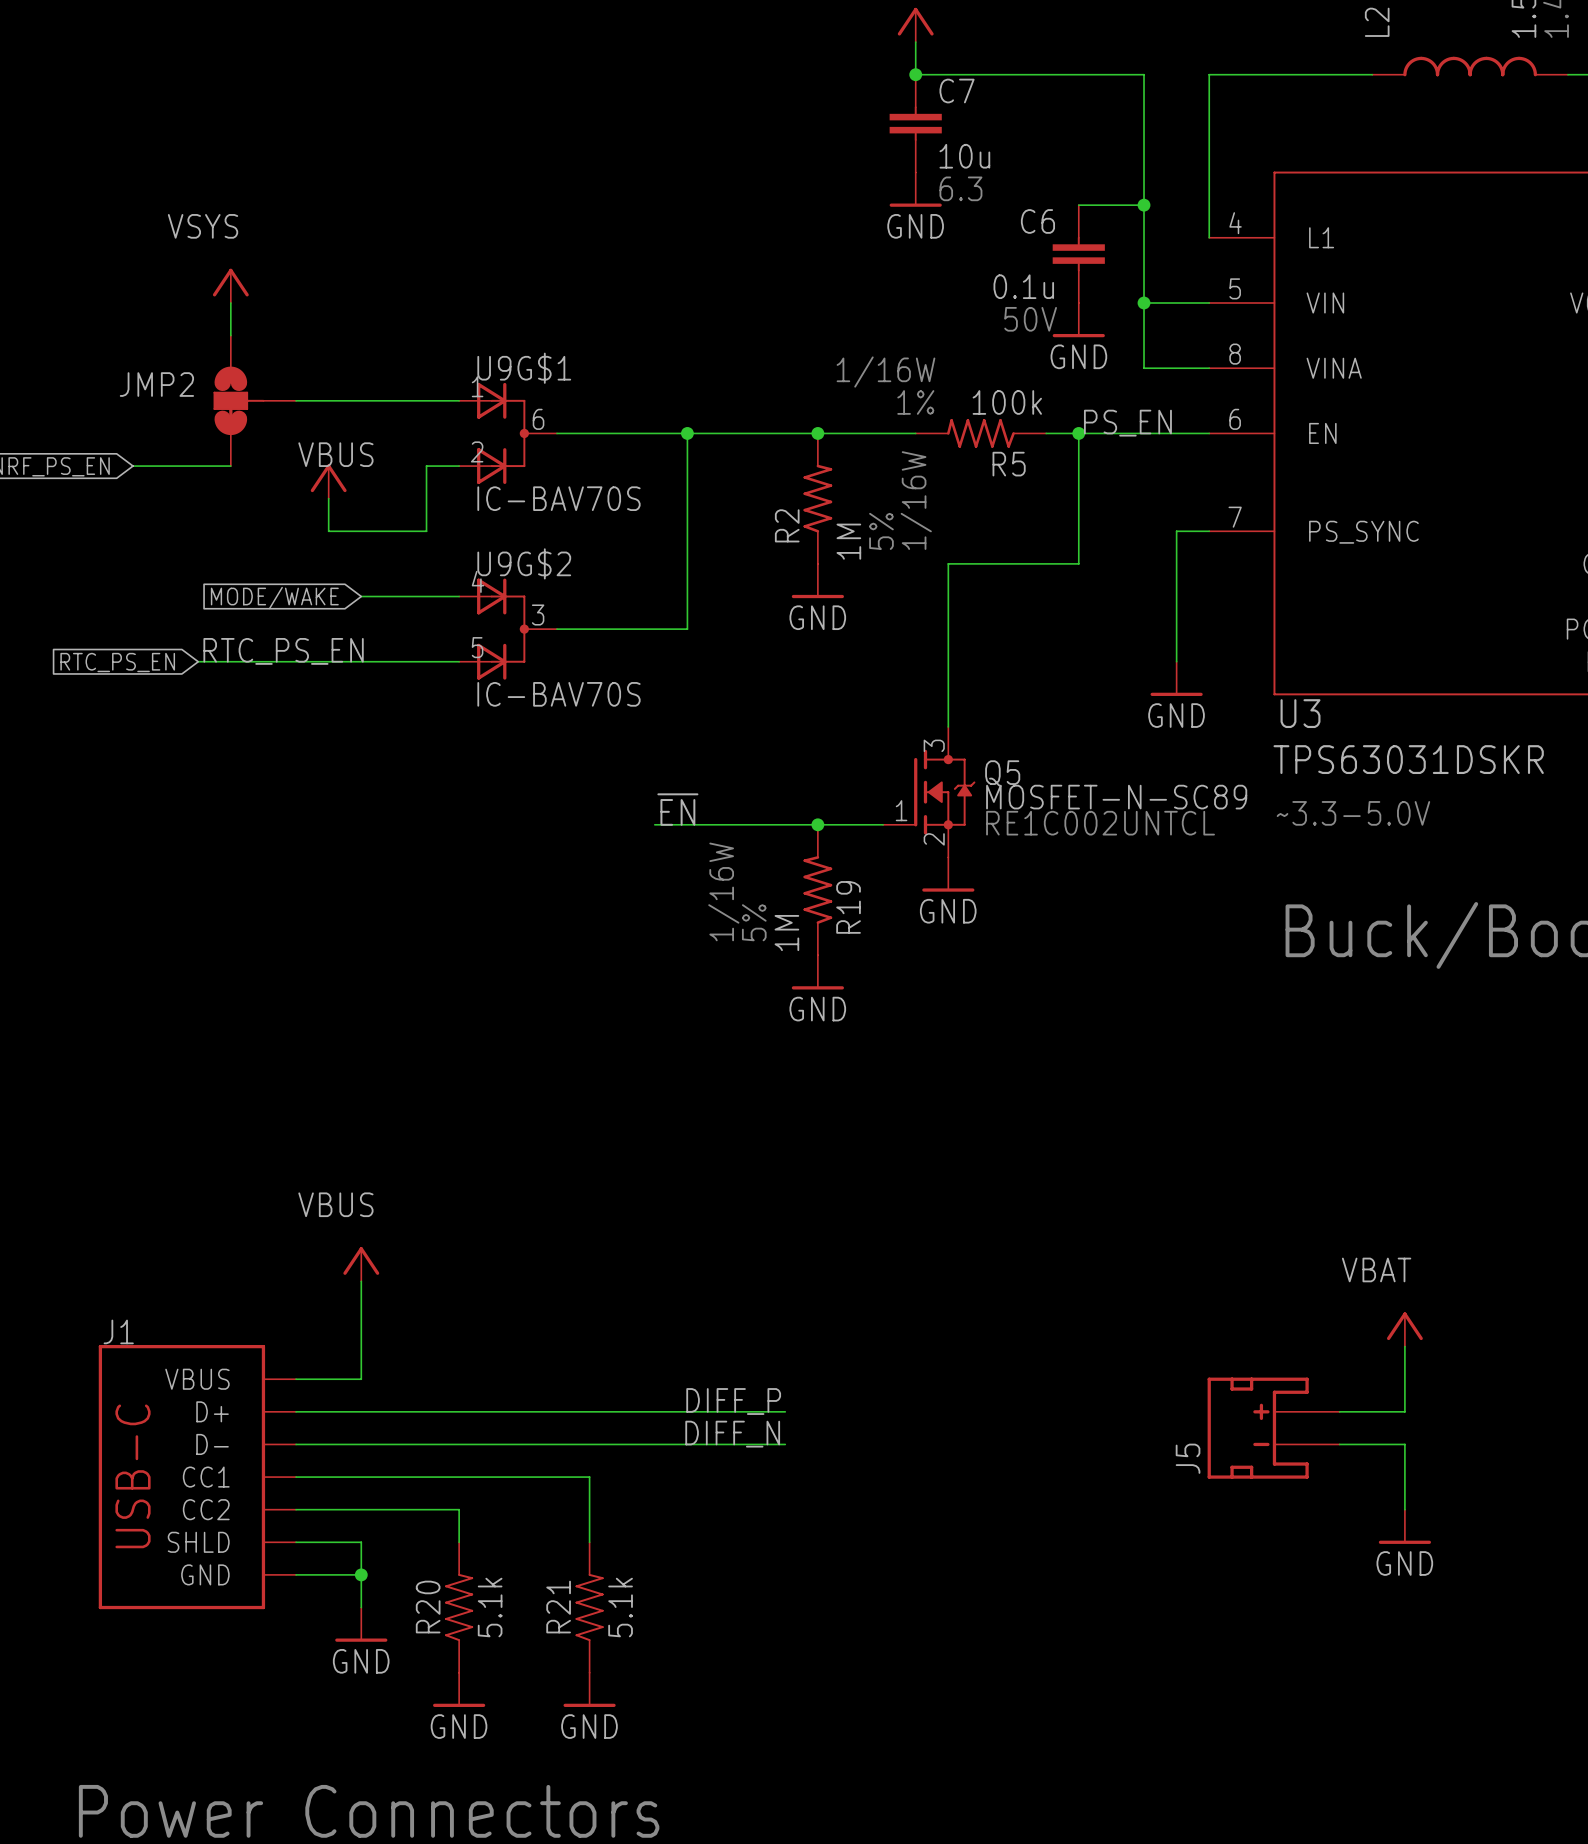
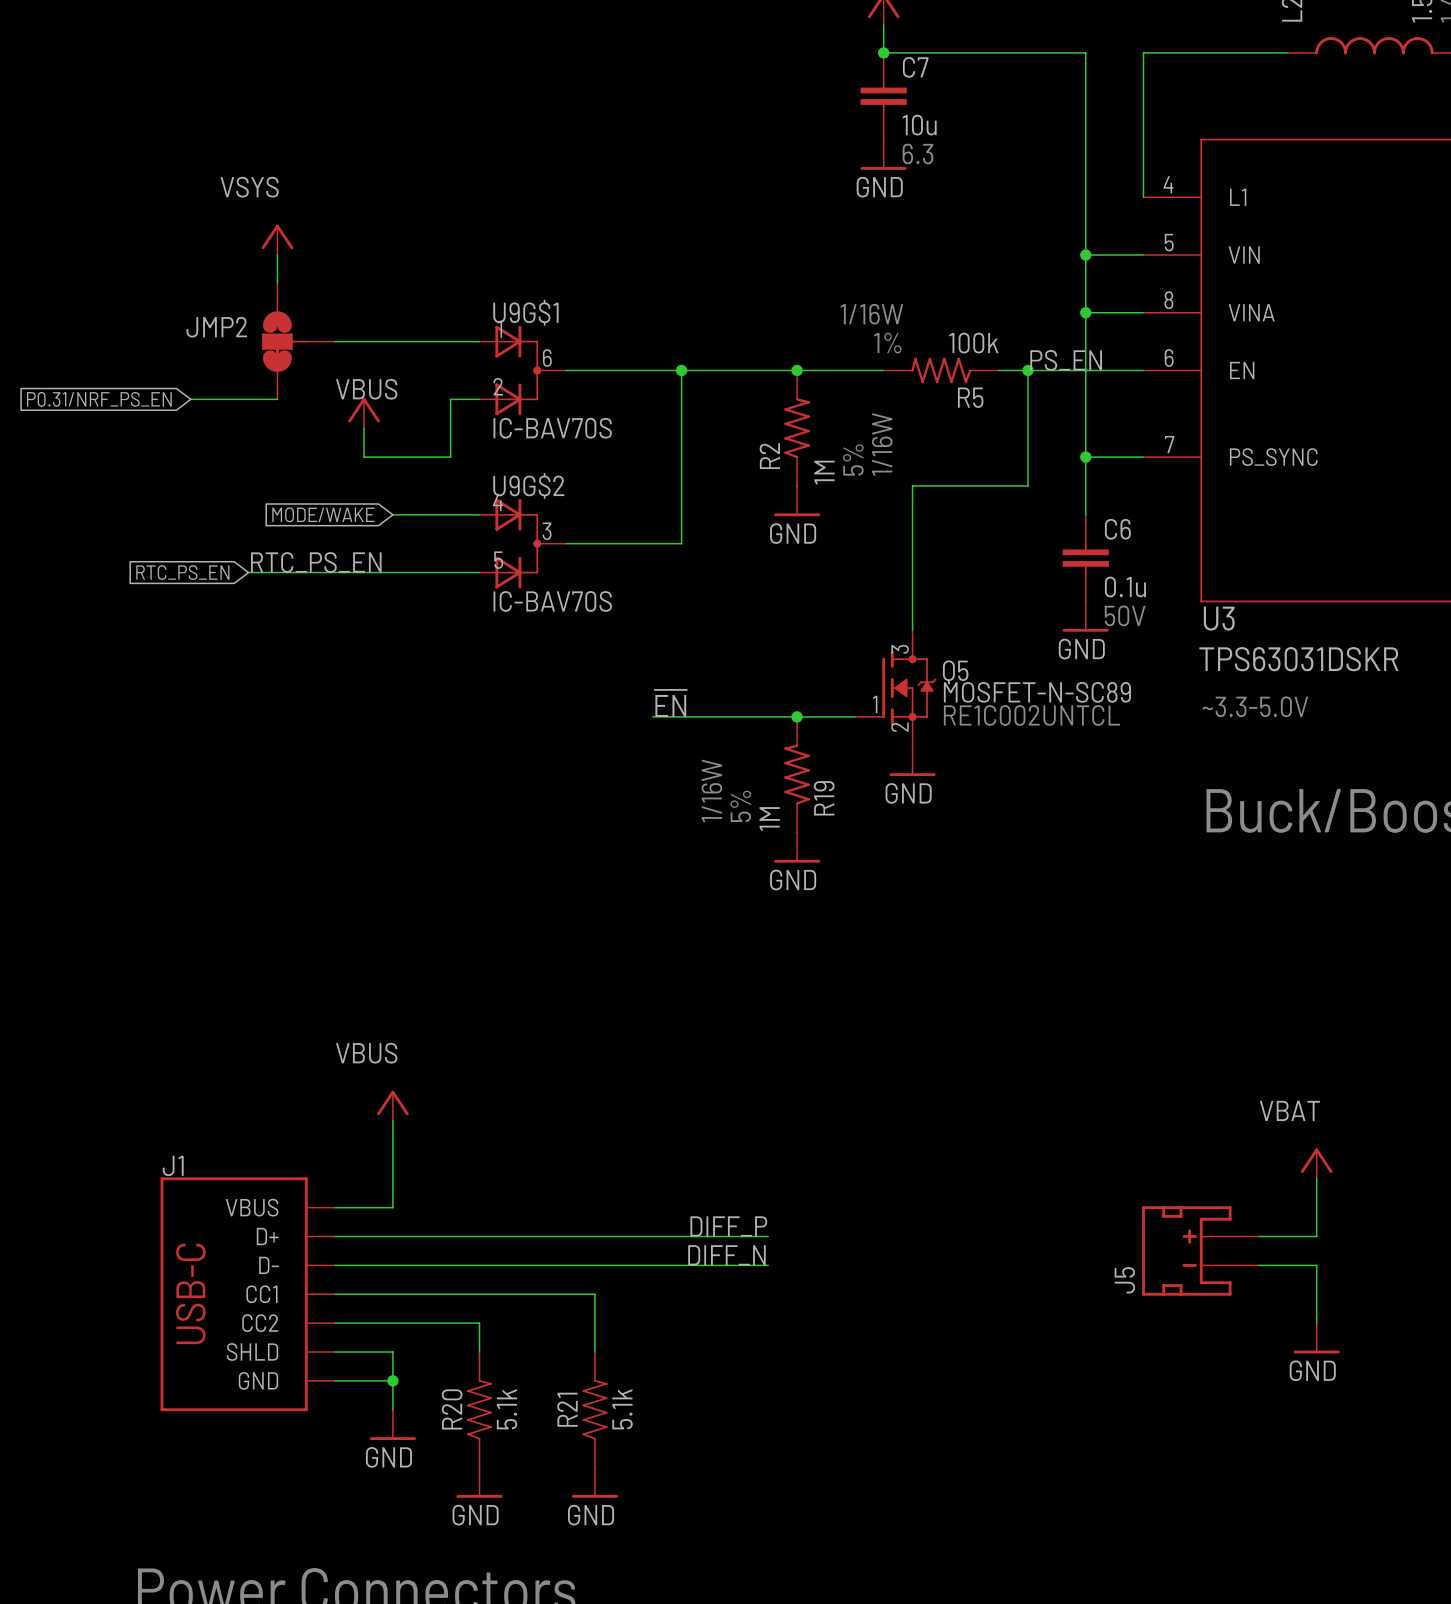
wire: (1078, 205) (1144, 205) -> none
junction: (1144, 205) -> none
C6 name position: C6 (1037, 221) -> C6 (1117, 529)
C6 position: (1078, 254) -> (1085, 558)
C6 value position: 0.1u (1023, 286) -> 0.1u (1125, 587)
C6 text position: 50V (1030, 319) -> 50V (1125, 615)
power symbol: GND (1078, 320) -> none
wire: none -> (1085, 312) (1085, 514)
junction: none -> (1085, 312)
junction: none -> (1085, 457)
wire: (1176, 531) (1176, 661) -> (1114, 457) (1085, 457)
power symbol position: GND (1176, 678) -> GND (1085, 616)

